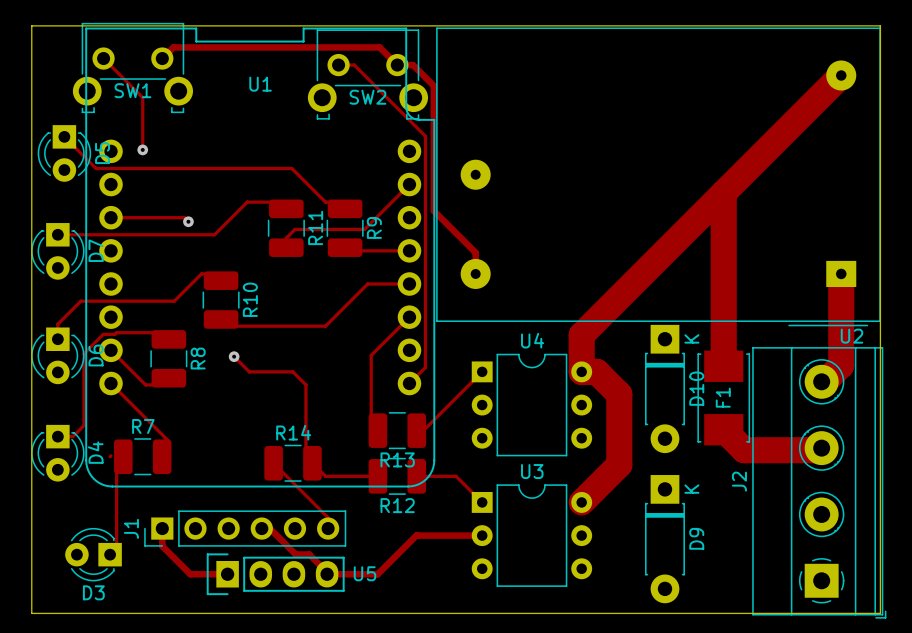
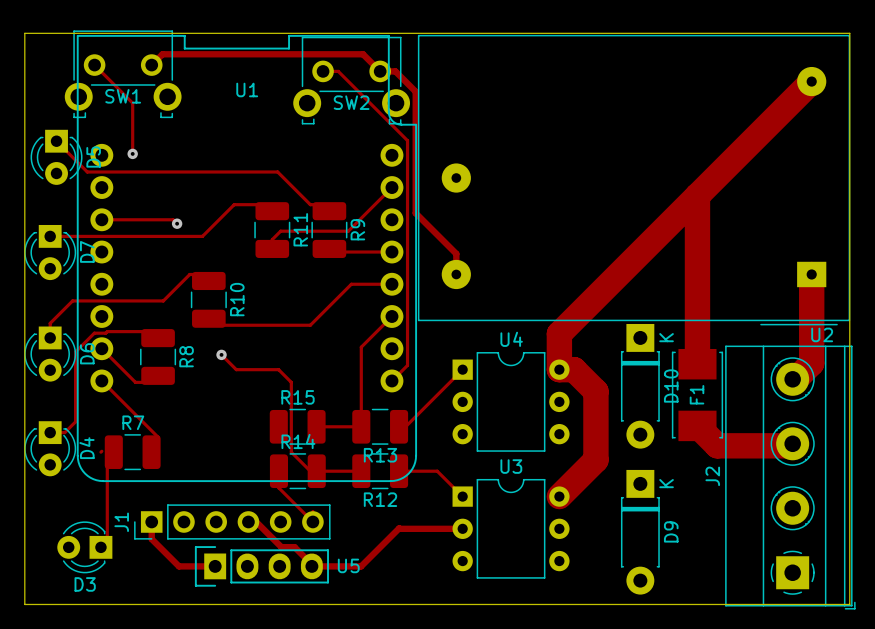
track: (377, 348) (371, 355) (371, 427) -> (361, 347) (361, 426) (316, 426)
R15: none -> (297, 426)
track: (273, 463) (328, 517) -> none
R14 position: (293, 463) -> (297, 471)
track: none -> (278, 471) (278, 488) (312, 521)

